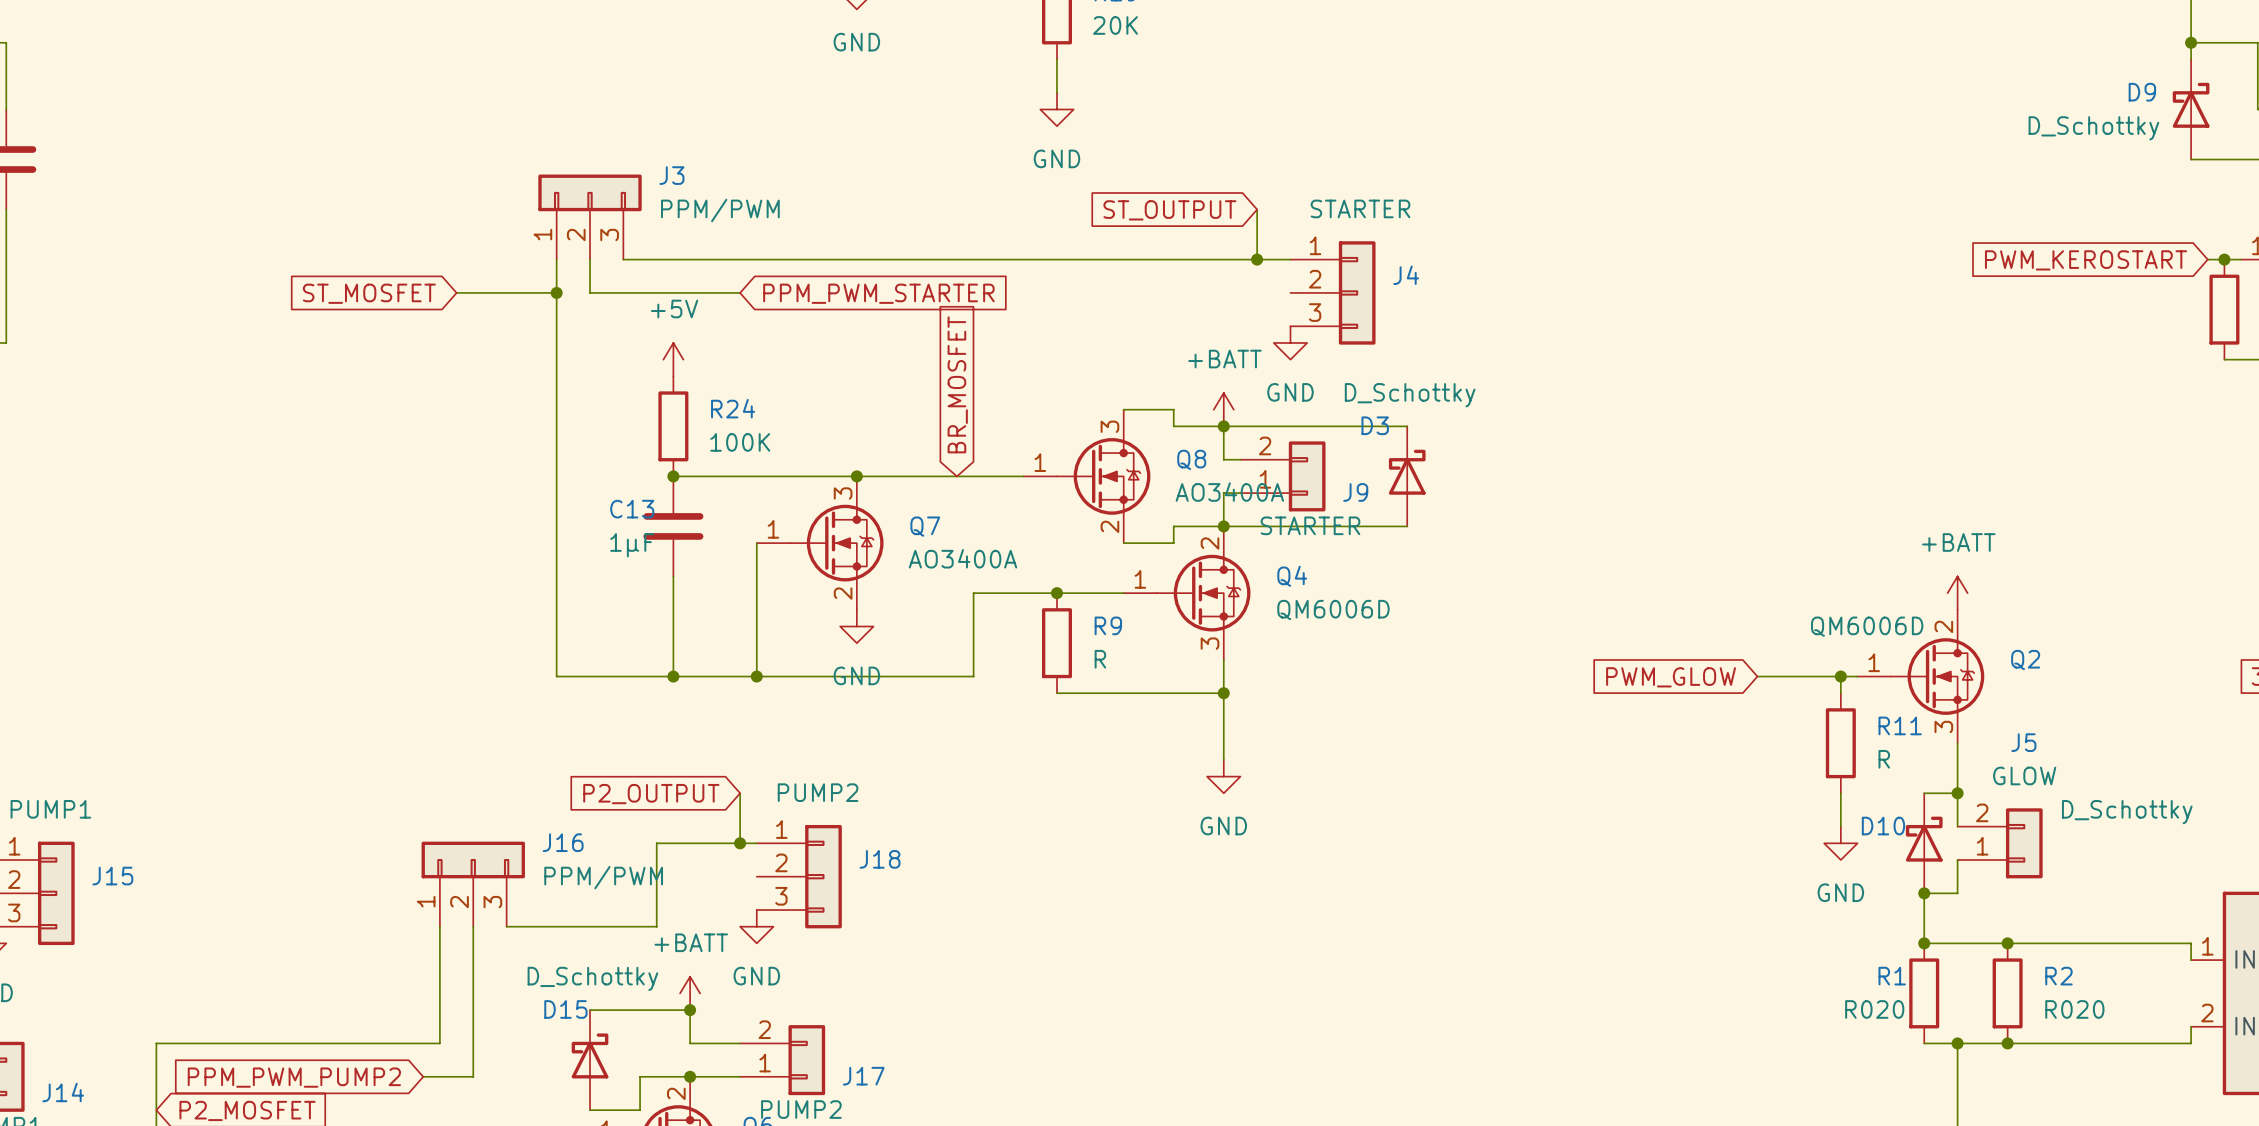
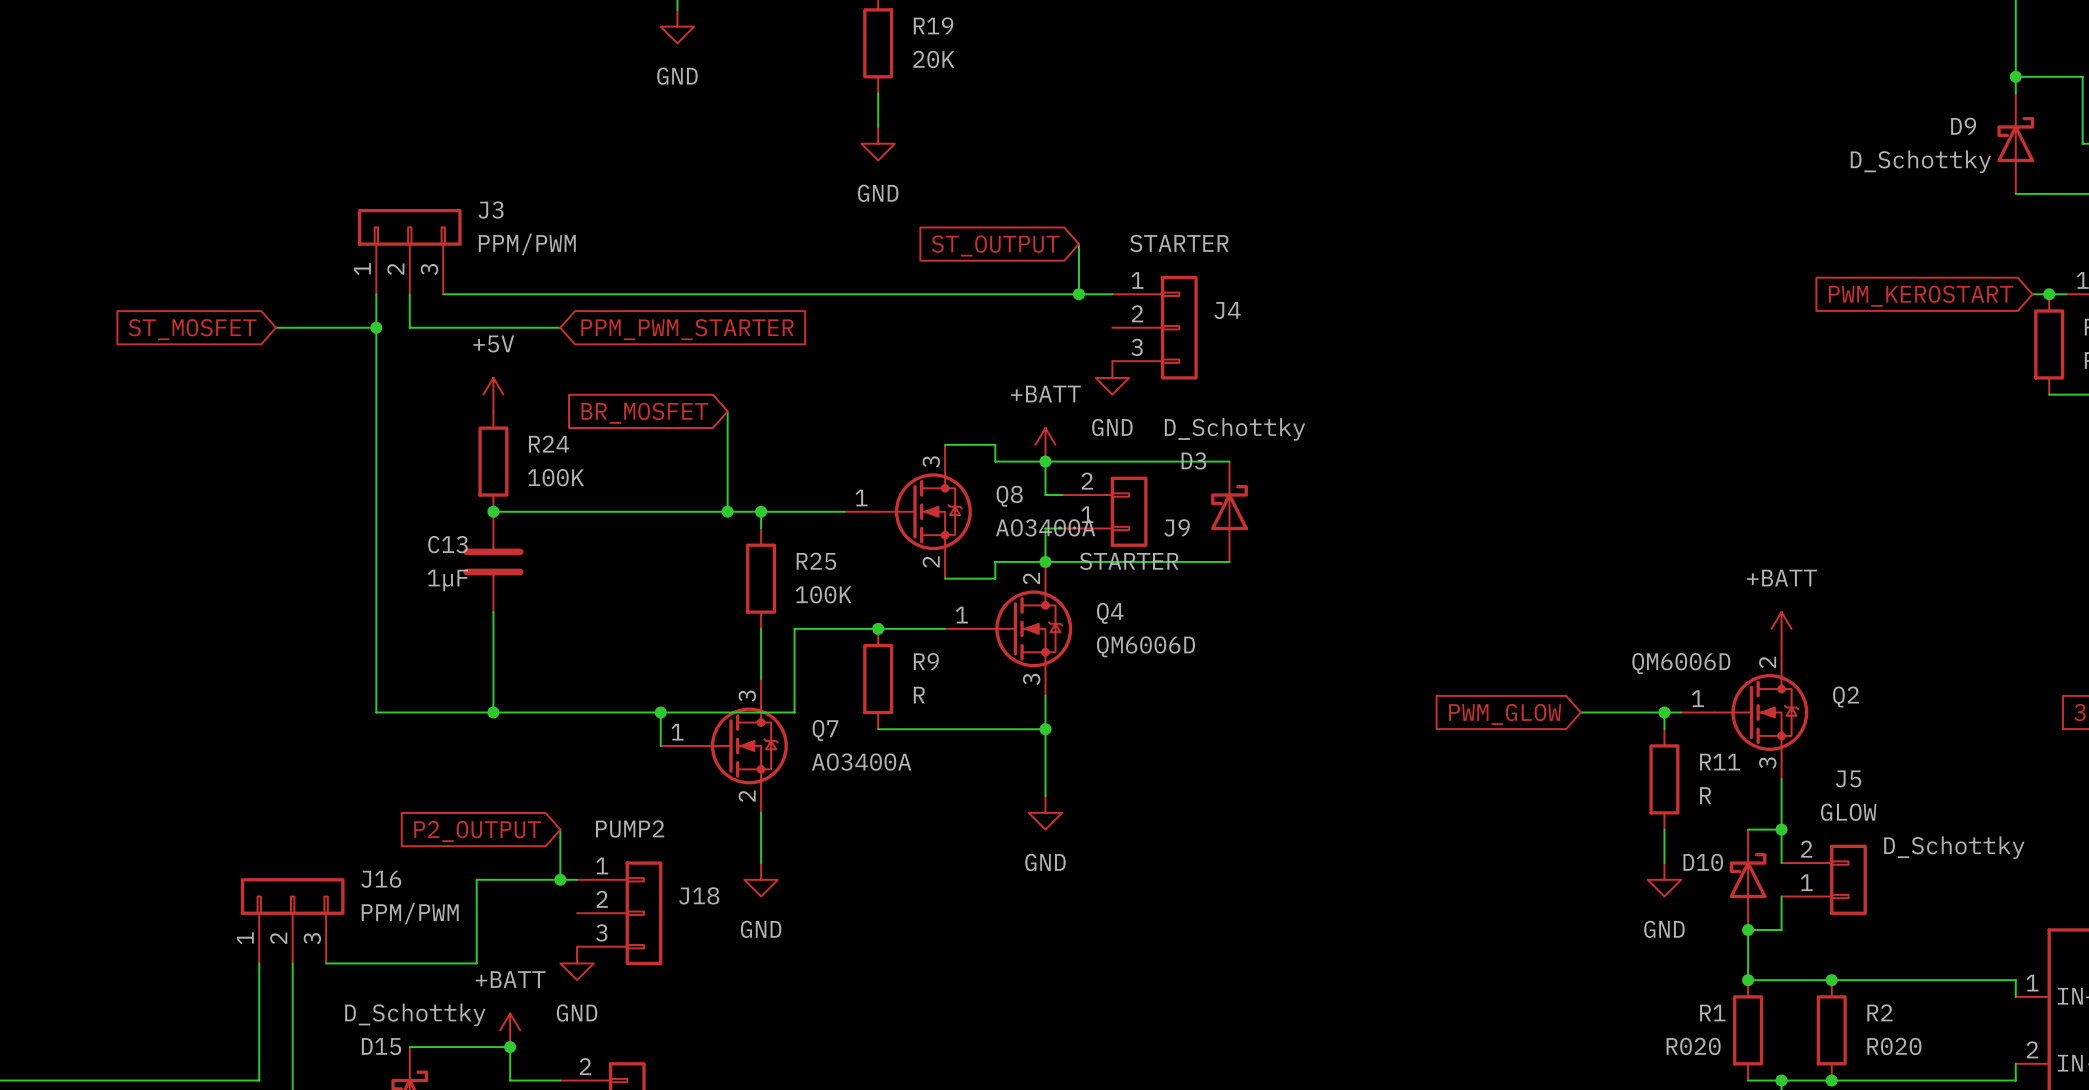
wire: none -> (727, 411) (727, 511)
global label rotation: 0° (957, 384) -> 90° counterclockwise (644, 413)
junction: (856, 476) -> none
junction: none -> (727, 511)
wire: none -> (761, 511) (761, 528)
junction: none -> (761, 511)
wire: (756, 543) (756, 676) -> none
Q7 position: (820, 543) -> (724, 745)
R25: none -> 100K (761, 578)
wire: none -> (761, 628) (761, 679)
power symbol position: GND (856, 626) -> GND (761, 879)
junction: (756, 676) -> none
wire: none -> (660, 712) (660, 745)
junction: none -> (660, 712)
wire: none -> (761, 812) (761, 863)

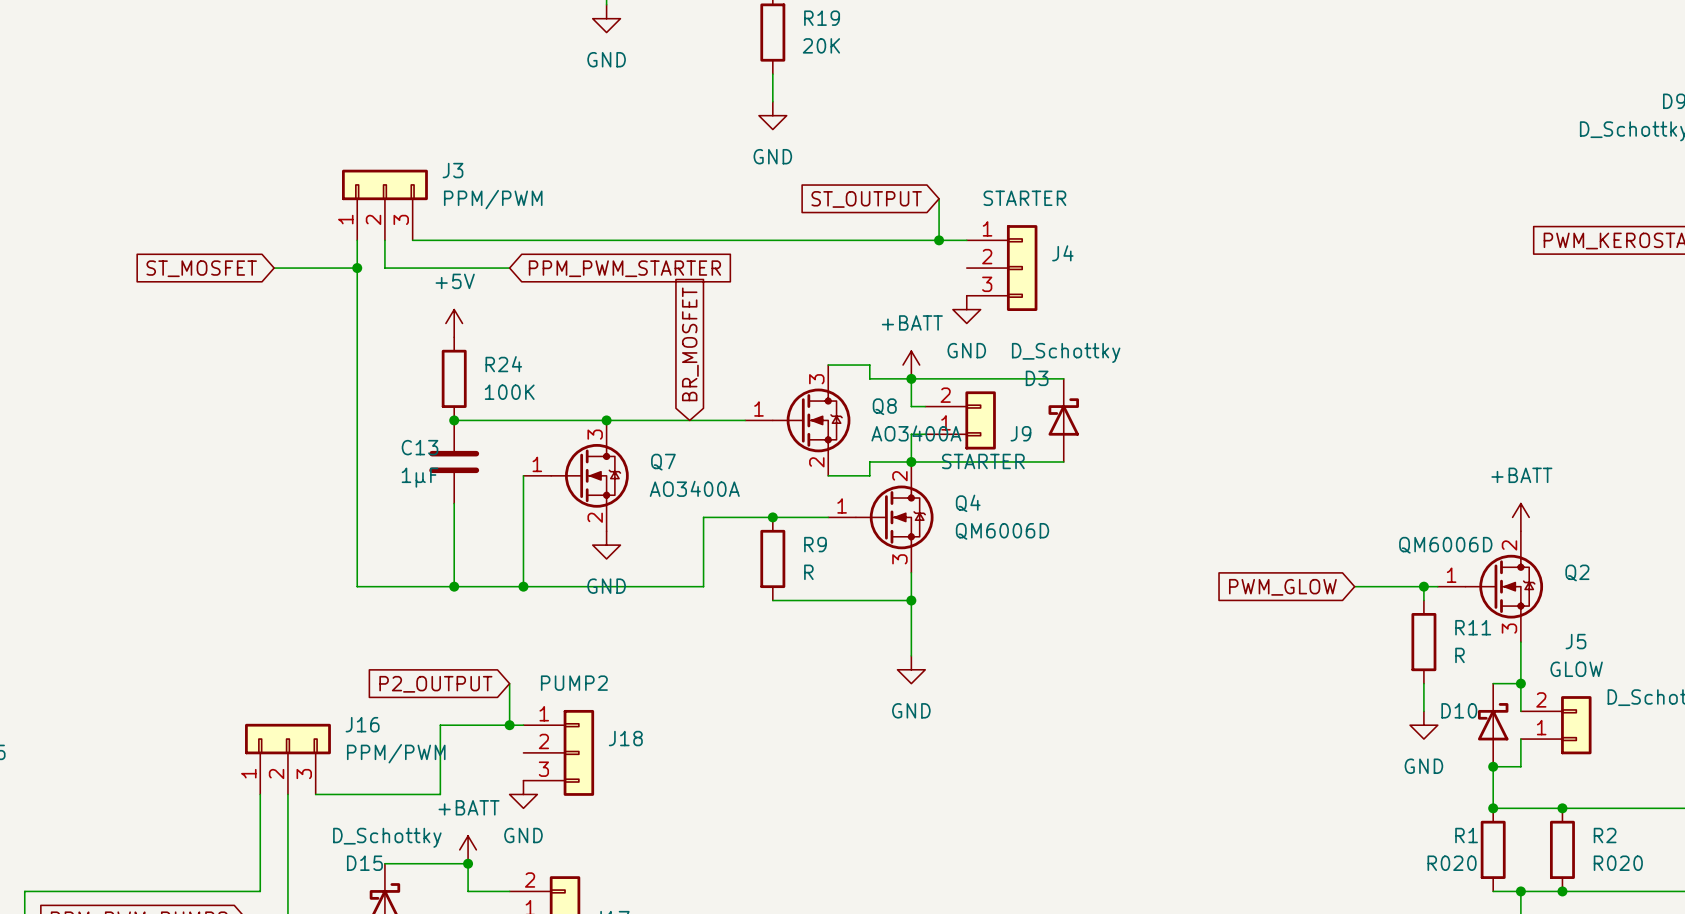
wire: (727, 411) (727, 511) -> none
global label rotation: 0° (644, 413) -> 90° clockwise (690, 344)
junction: none -> (606, 420)
junction: (727, 511) -> none
wire: (761, 511) (761, 528) -> none
junction: (761, 511) -> none
wire: none -> (523, 475) (523, 586)
R25: 100K (761, 578) -> none
wire: (761, 628) (761, 679) -> none
junction: none -> (523, 586)
wire: (660, 712) (660, 745) -> none
junction: (660, 712) -> none
Q7 position: (724, 745) -> (576, 475)
wire: (761, 812) (761, 863) -> none
power symbol position: GND (761, 879) -> GND (606, 545)

